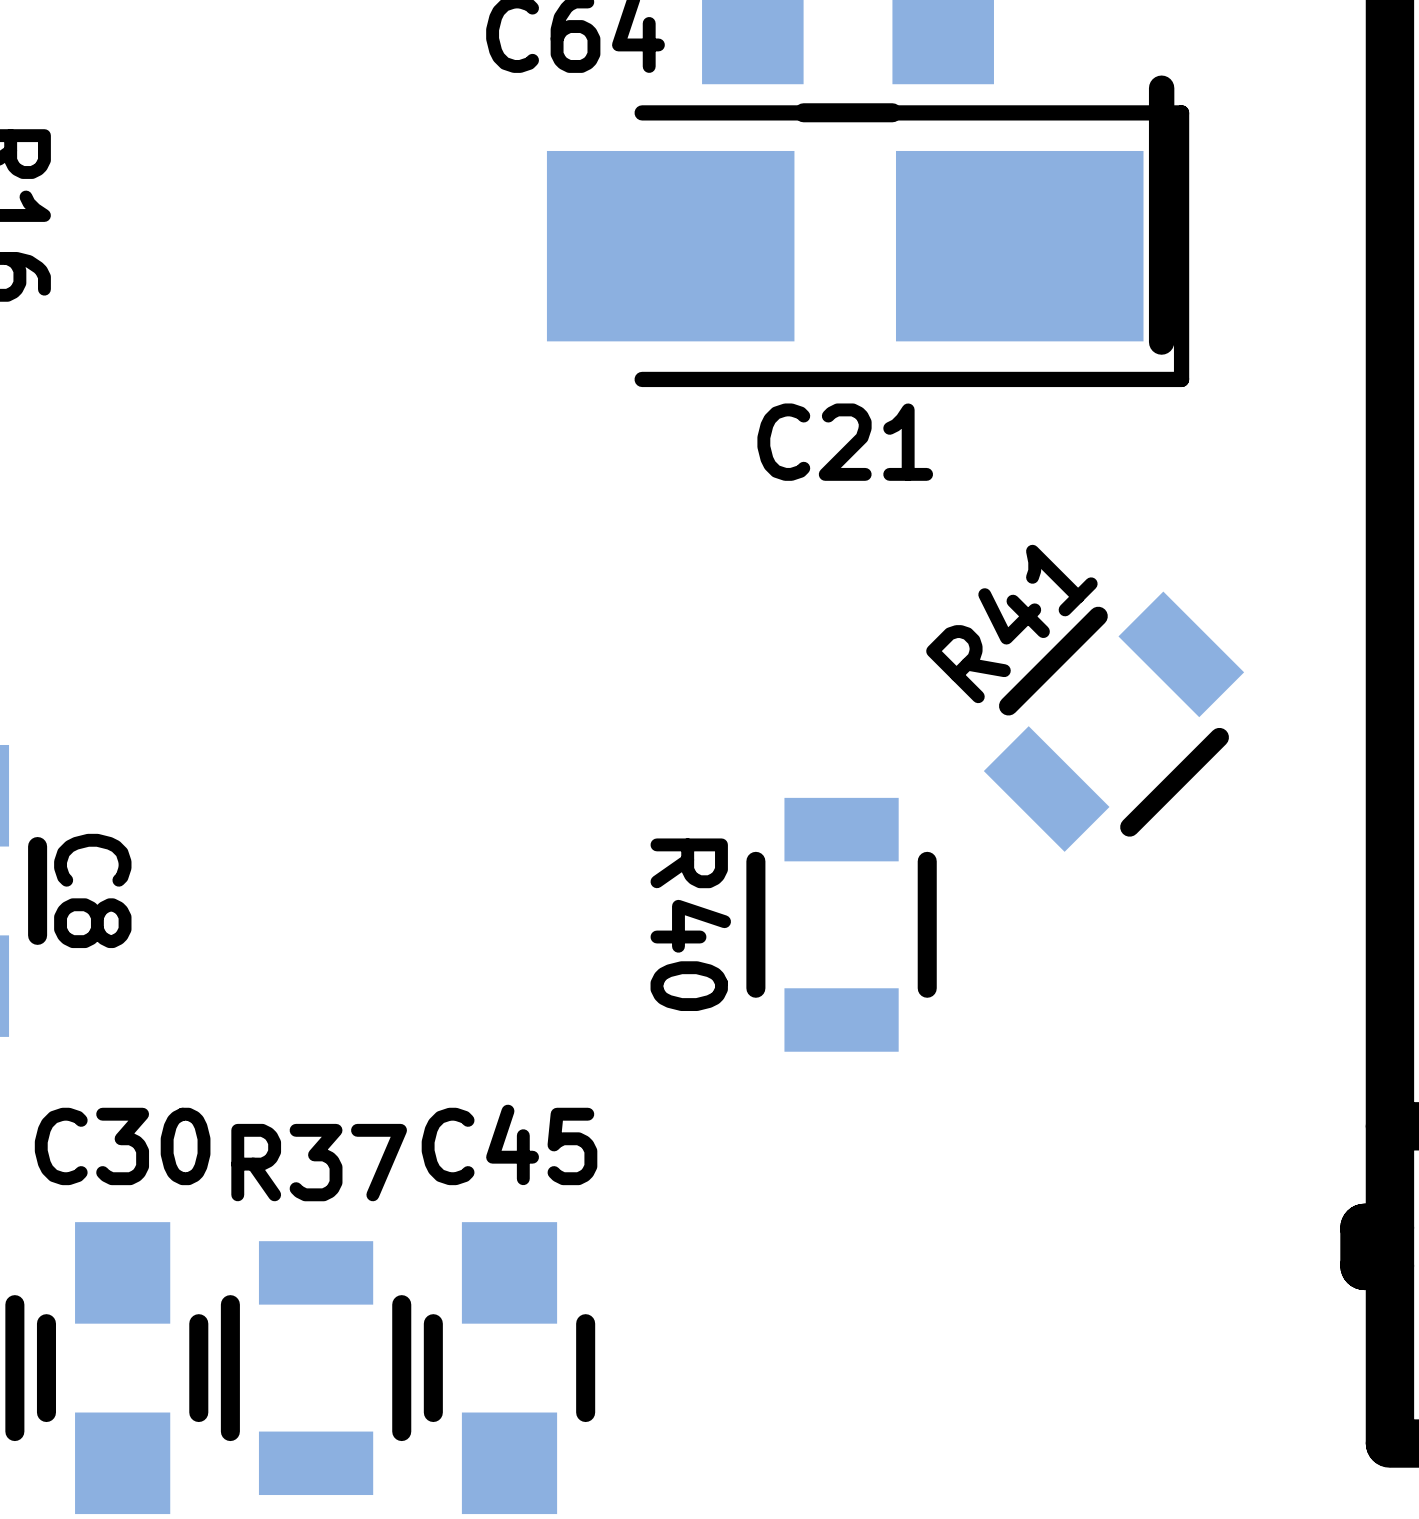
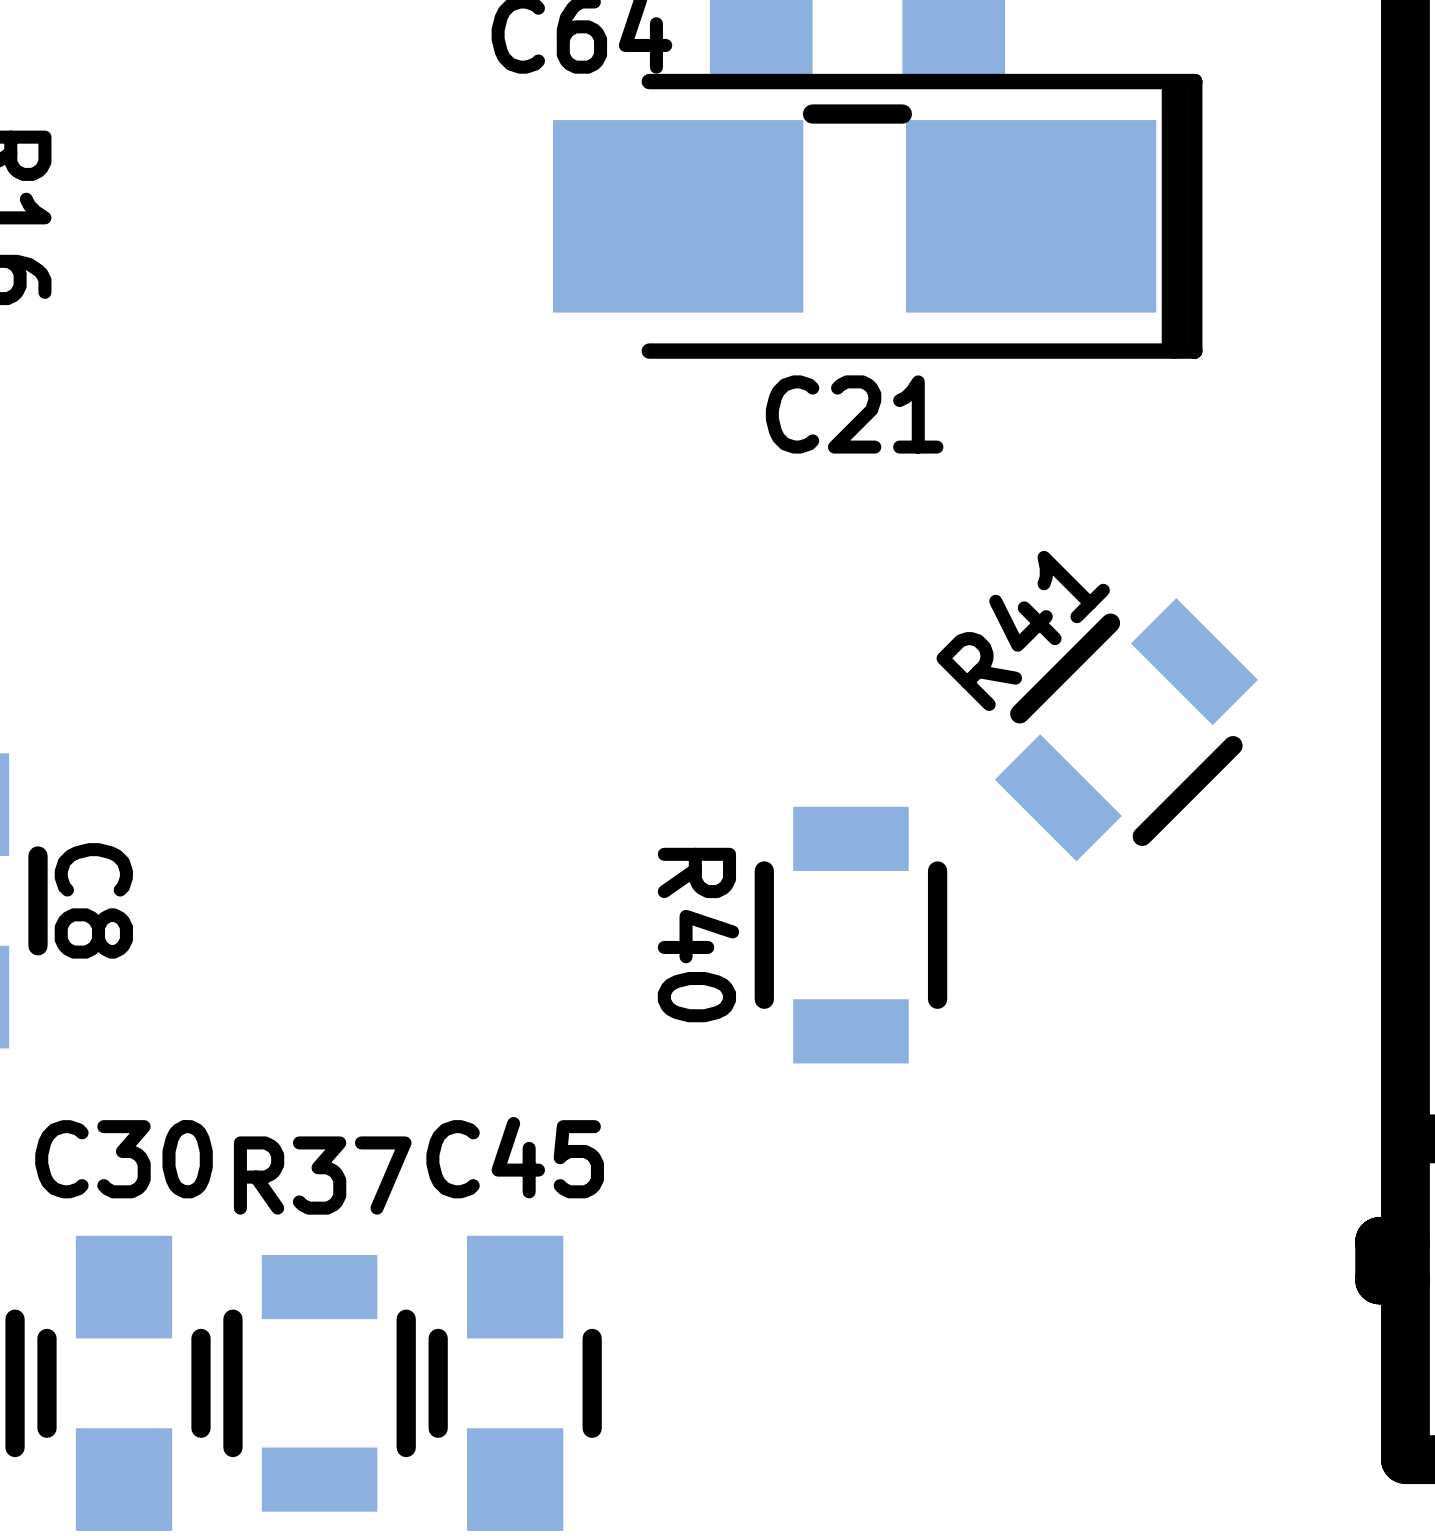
C21 position: (868, 246) -> (877, 216)

